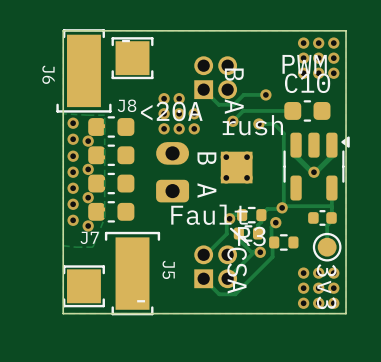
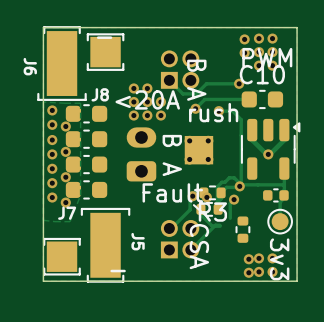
via: (333, 43) -> none
via: none -> (244, 39)
via: (333, 58) -> none
via: none -> (244, 52)
via: (333, 73) -> none
track: (265, 94) (243, 94) -> (239, 83) (205, 85)
via position: (265, 94) -> (239, 83)
track: none -> (239, 187) (241, 184) (234, 177) (229, 177) (224, 182) (221, 182) (217, 186) (217, 208)
via: none -> (206, 197)
track: (274, 242) (271, 243) (272, 256) (235, 294) (219, 294) (203, 278) -> none
part rotation: 0° (283, 242) -> 90° clockwise (242, 229)
via: (260, 252) -> none
via: (303, 273) -> none
via: (318, 273) -> none
via: (333, 273) -> none
via: (333, 288) -> none
via: none -> (248, 259)
via: (333, 303) -> none
via: none -> (248, 272)

